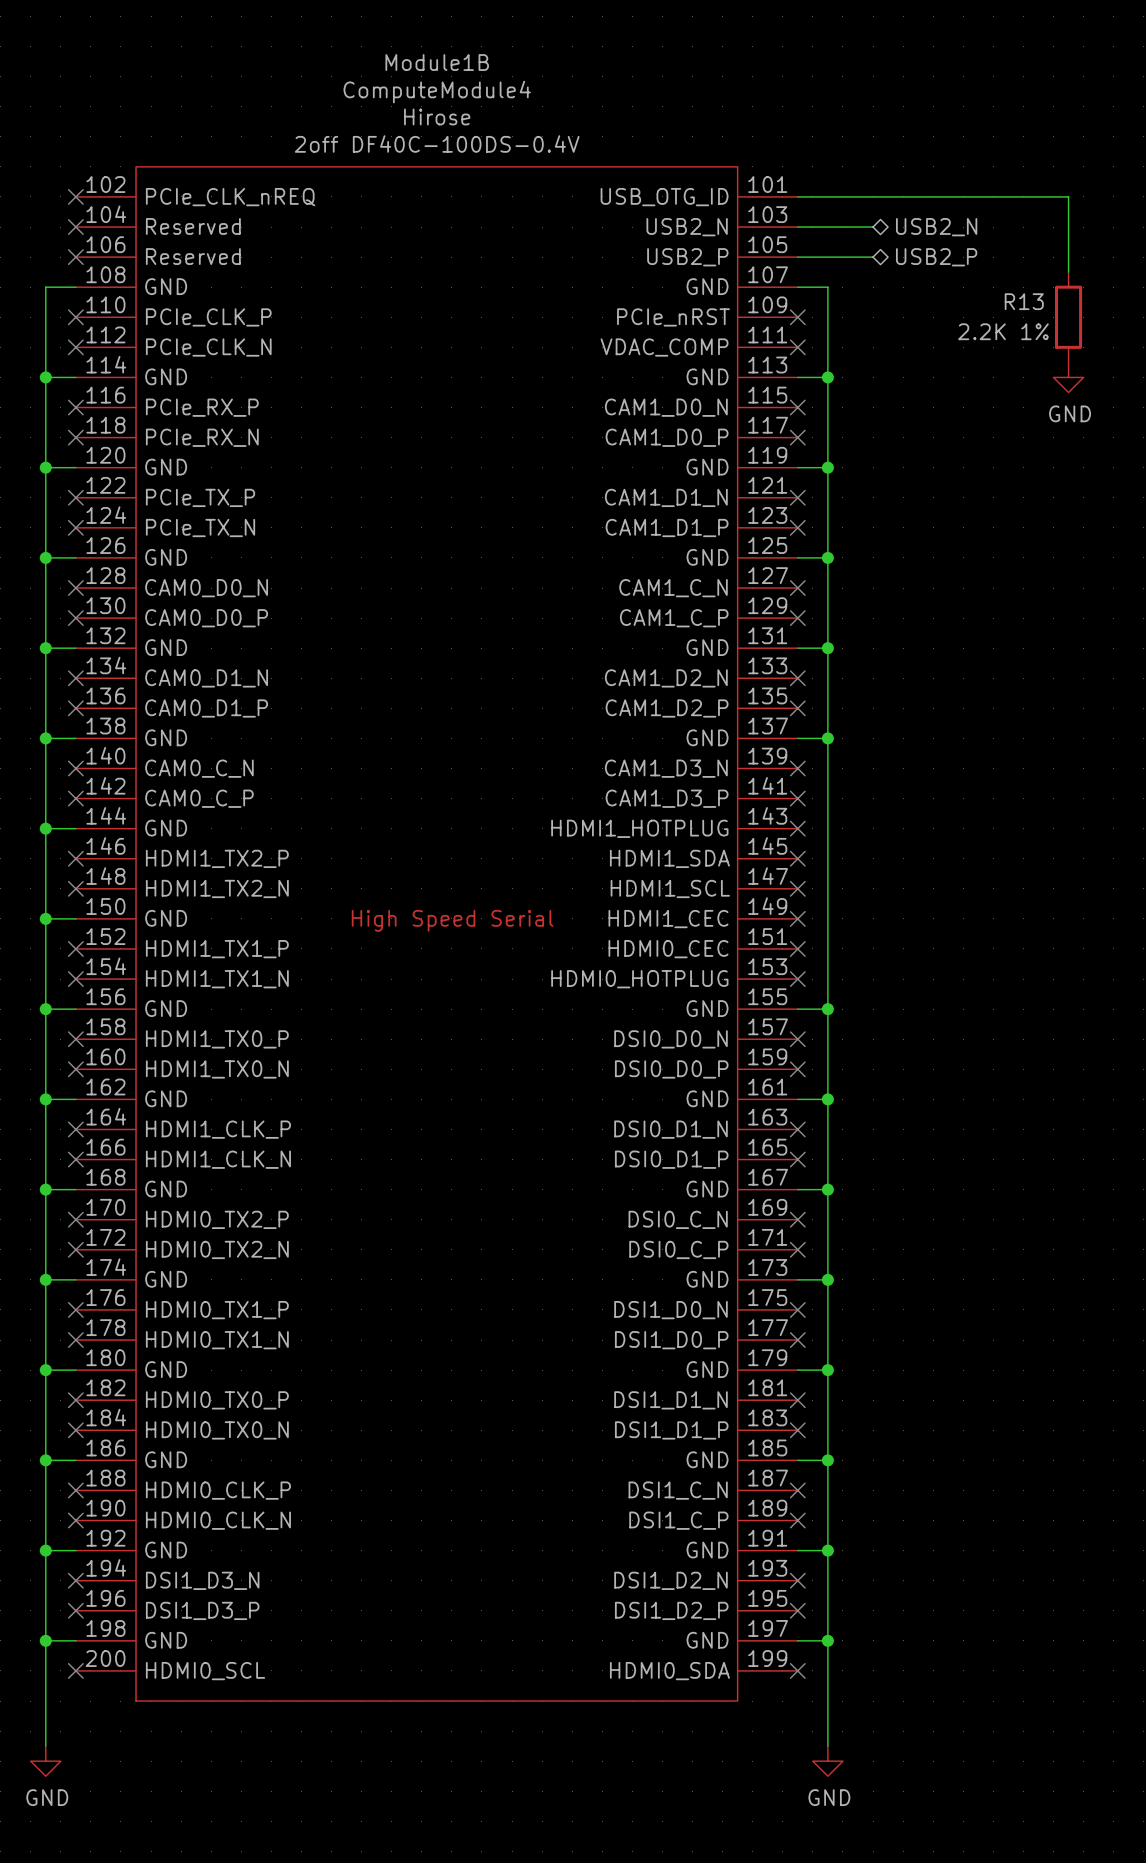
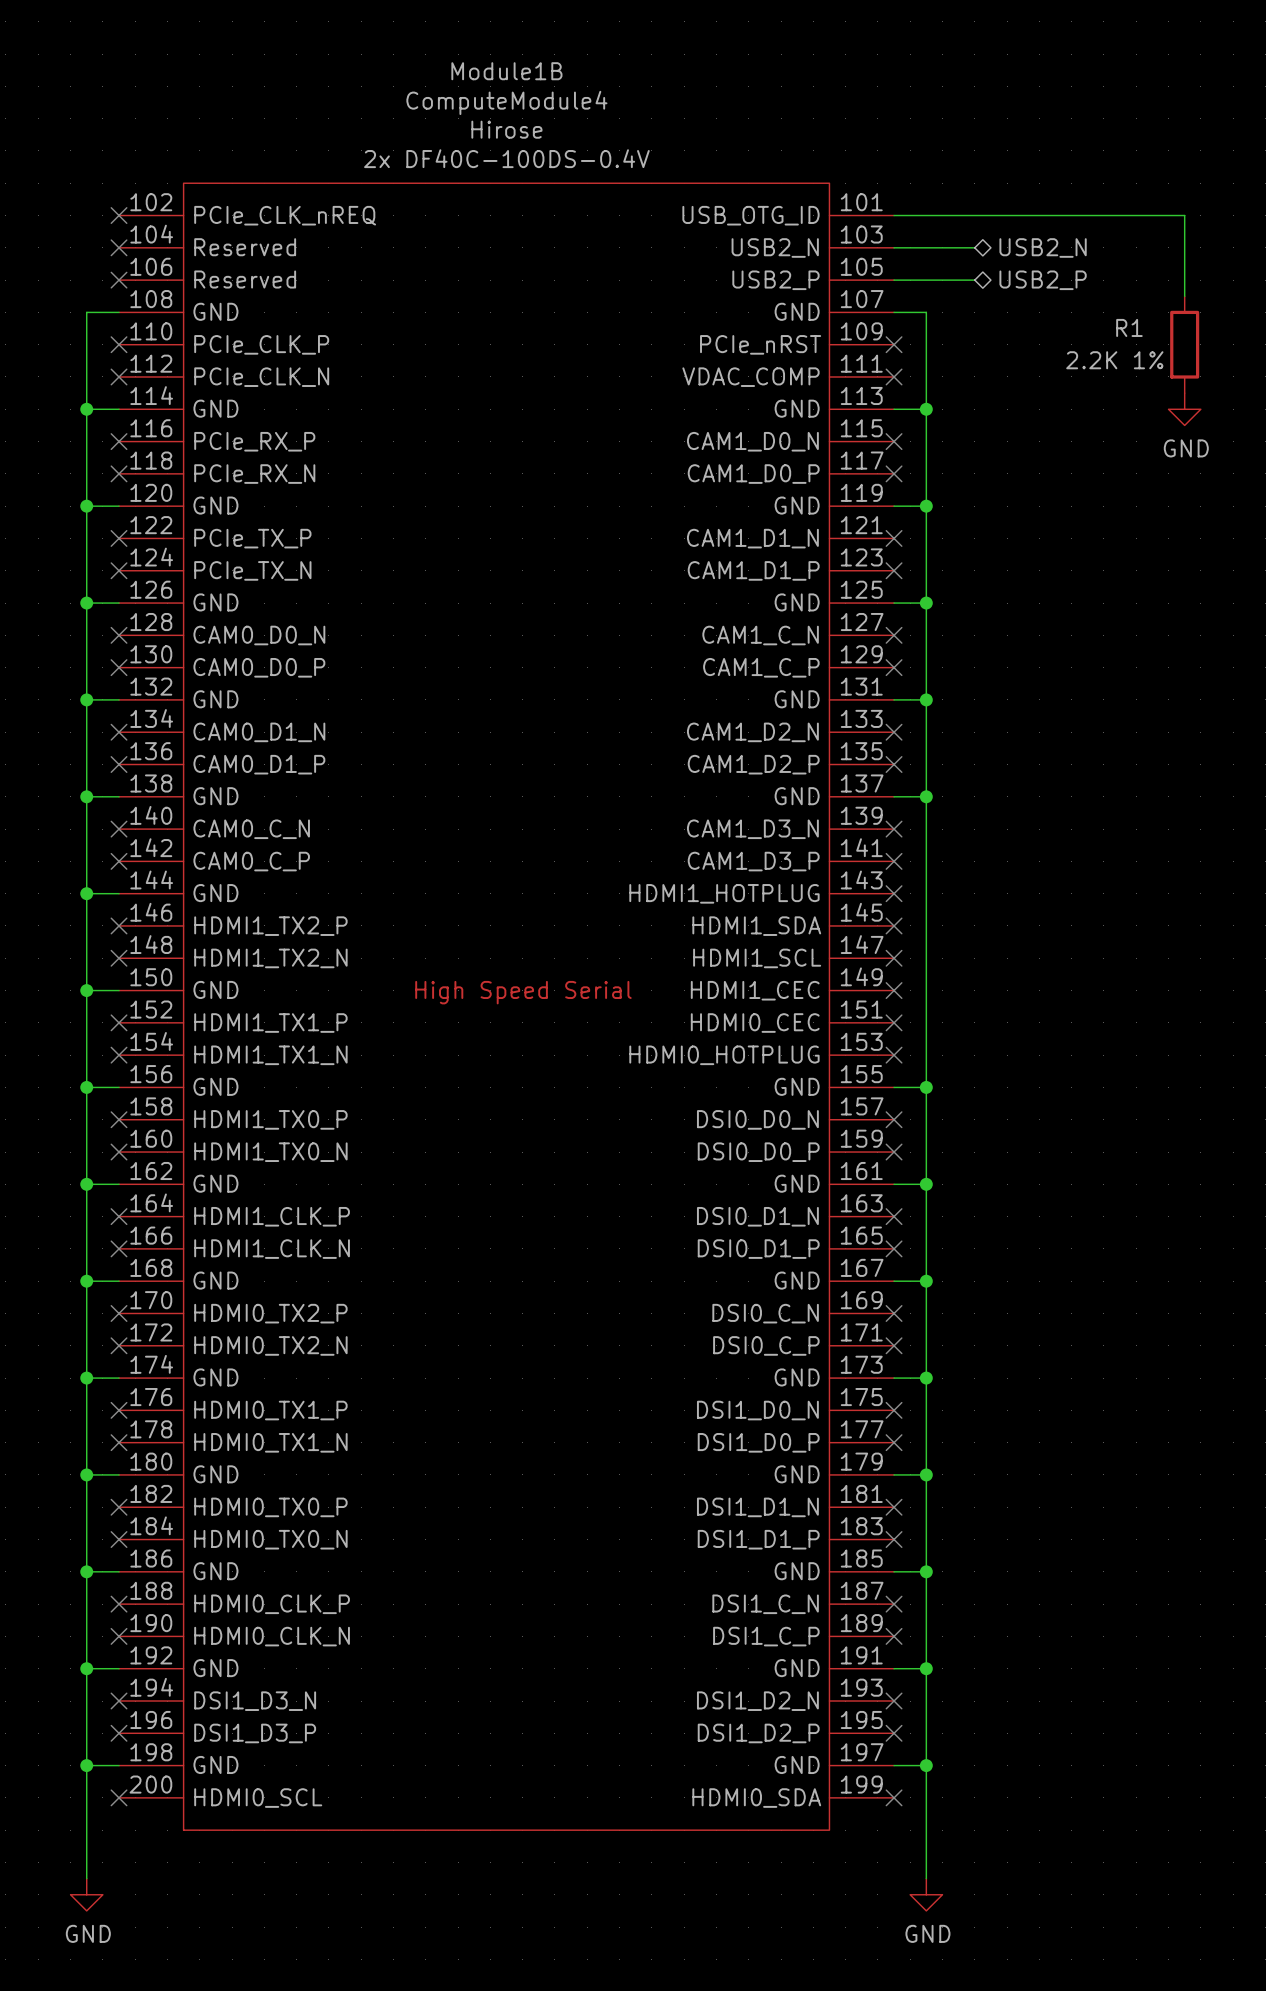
Module1B text: 2off DF40C-100DS-0.4V (437, 143) -> 2x DF40C-100DS-0.4V (506, 158)
R13 name: R13 (1024, 301) -> R1 (1129, 327)

